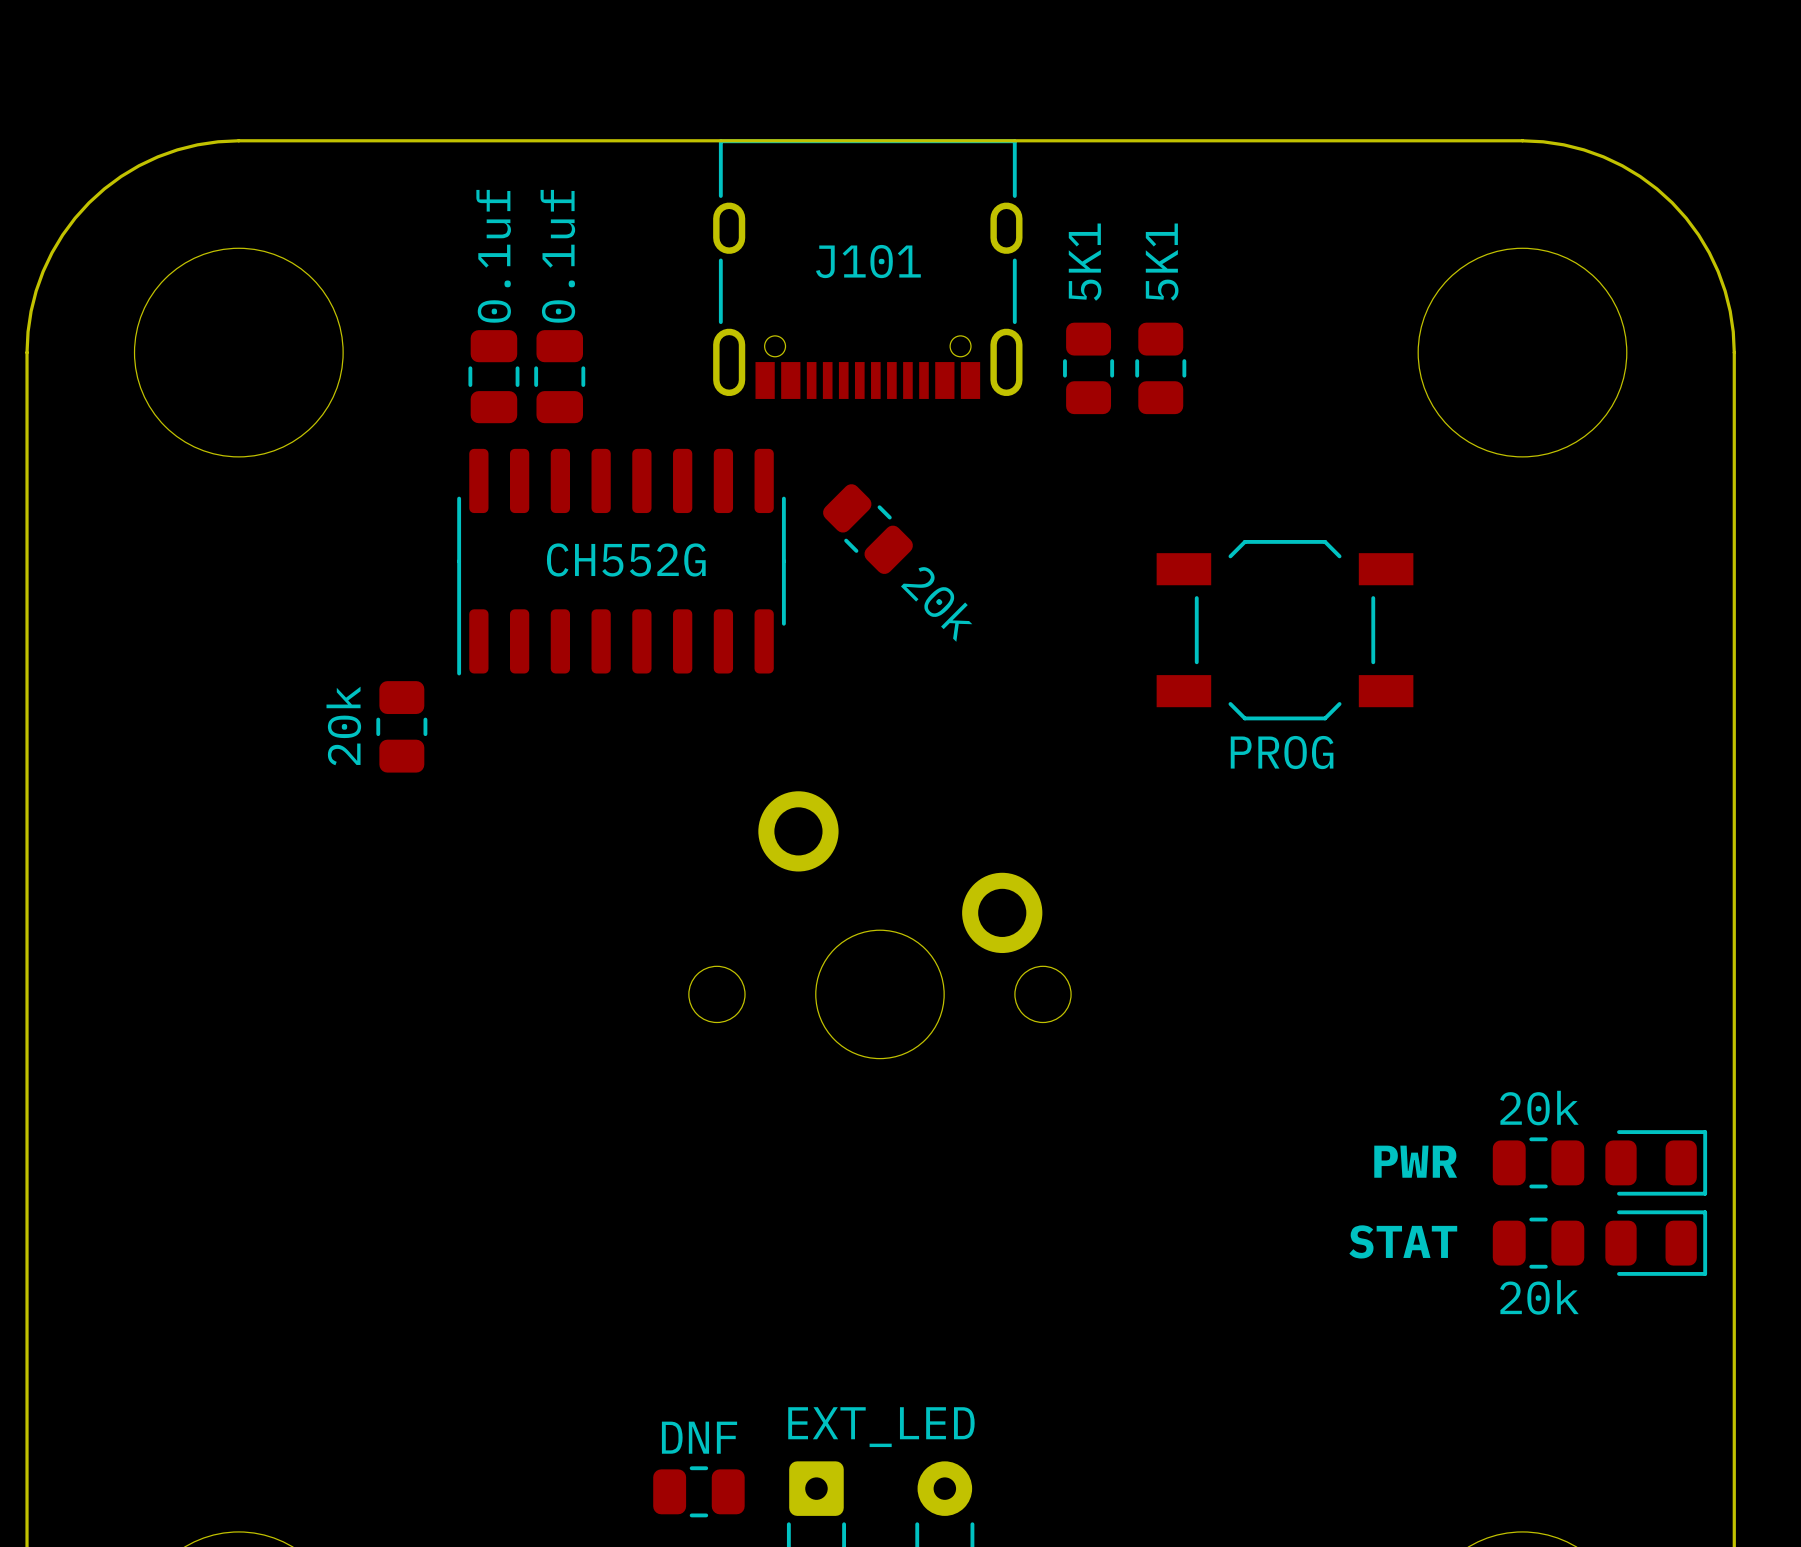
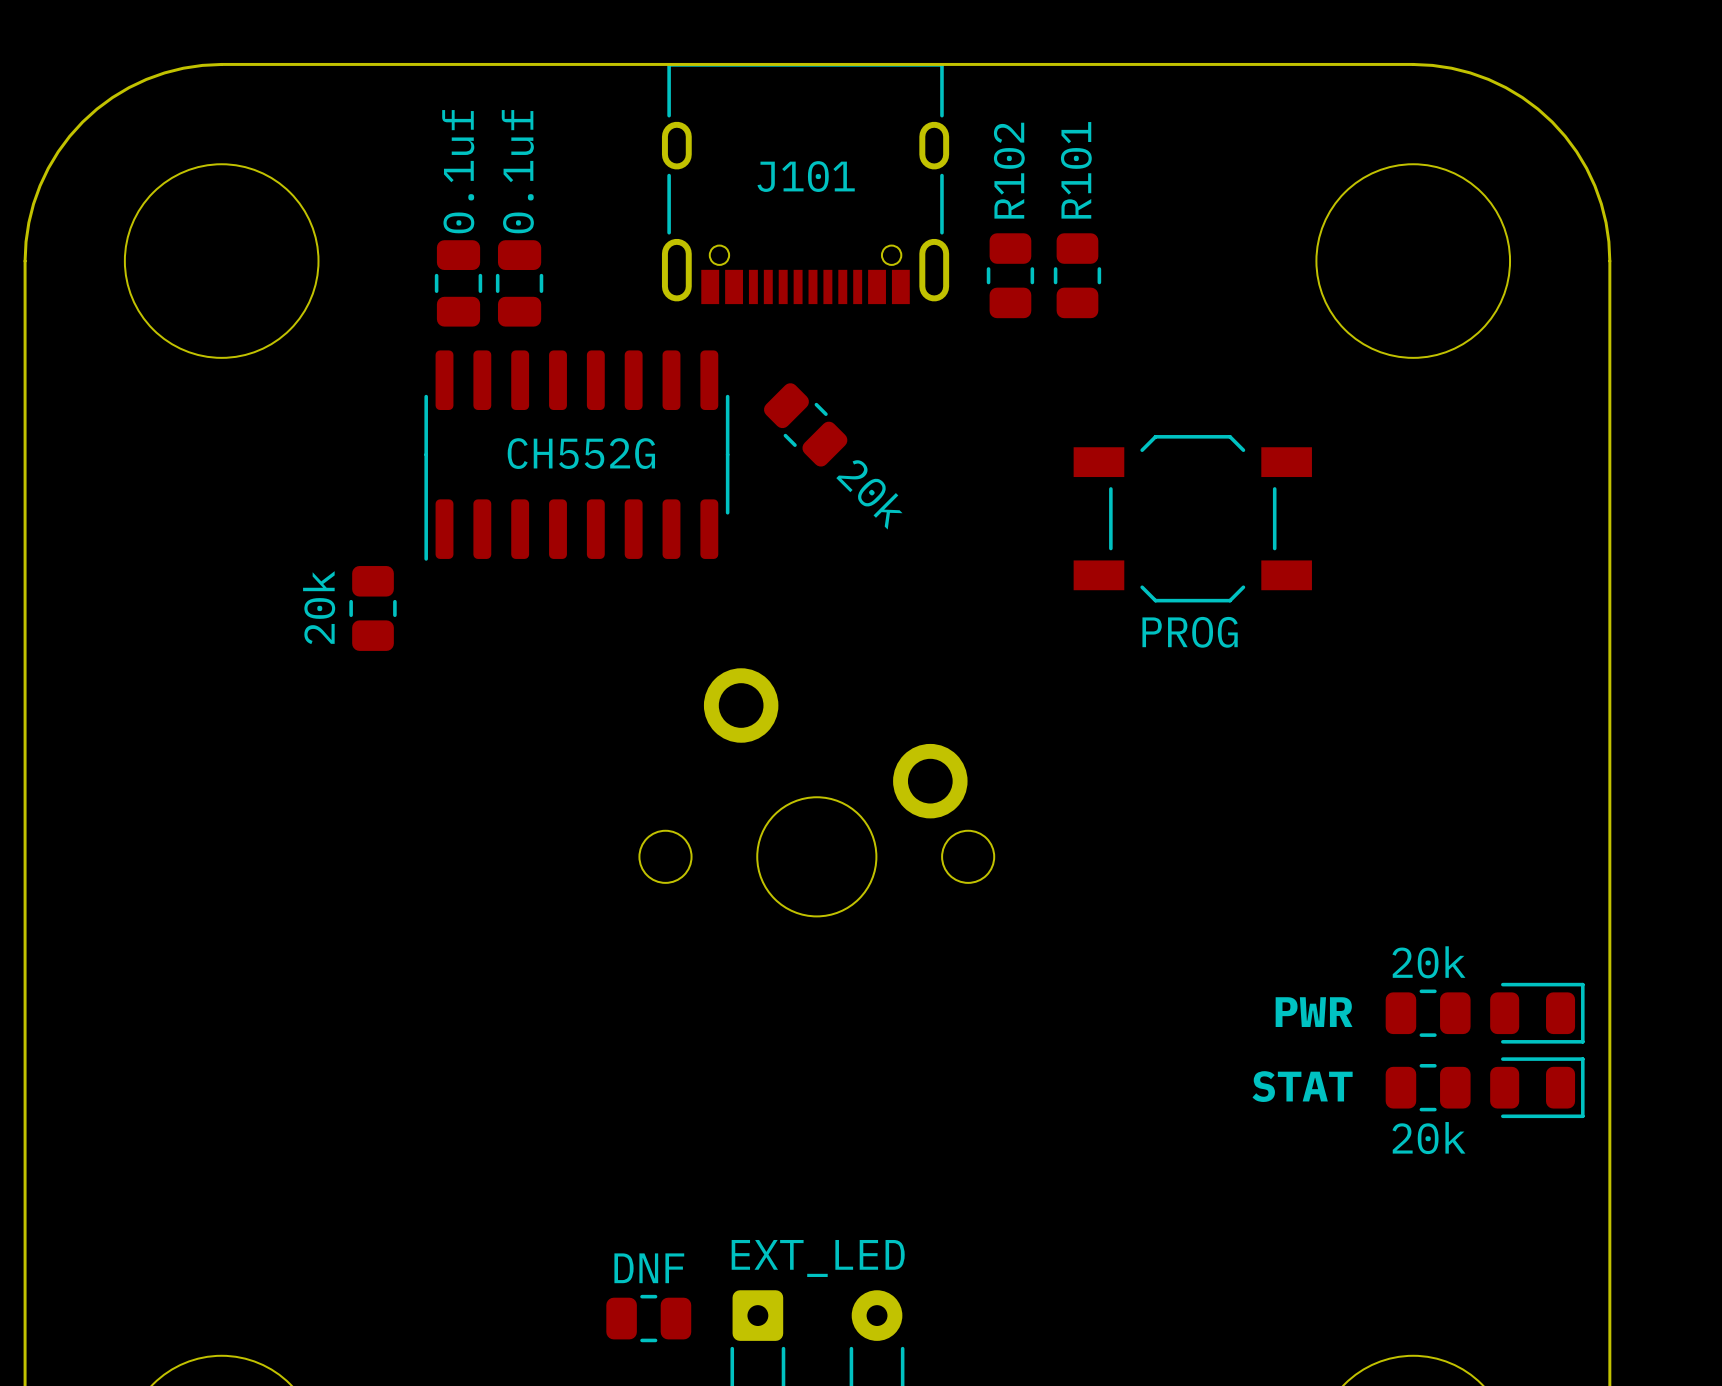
R101 name: none -> R101 (1076, 170)
R102 name: none -> R102 (1009, 170)
R102 value: 5K1 (1085, 262) -> none
R101 value: 5K1 (1162, 262) -> none

